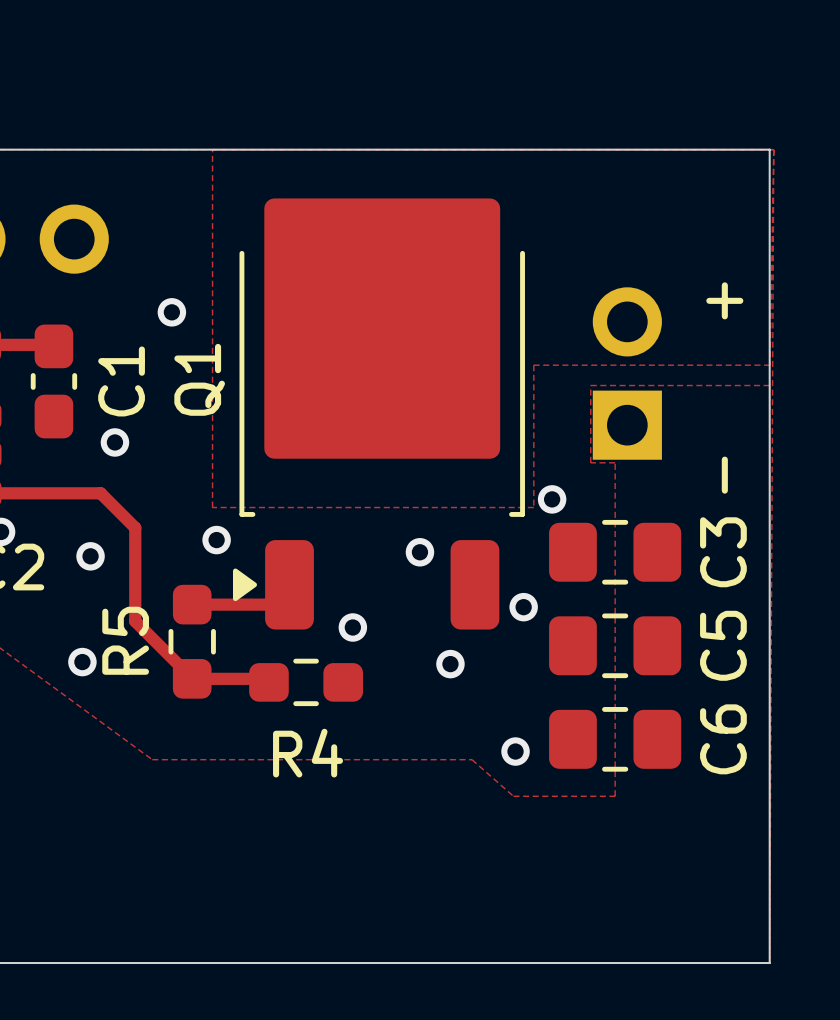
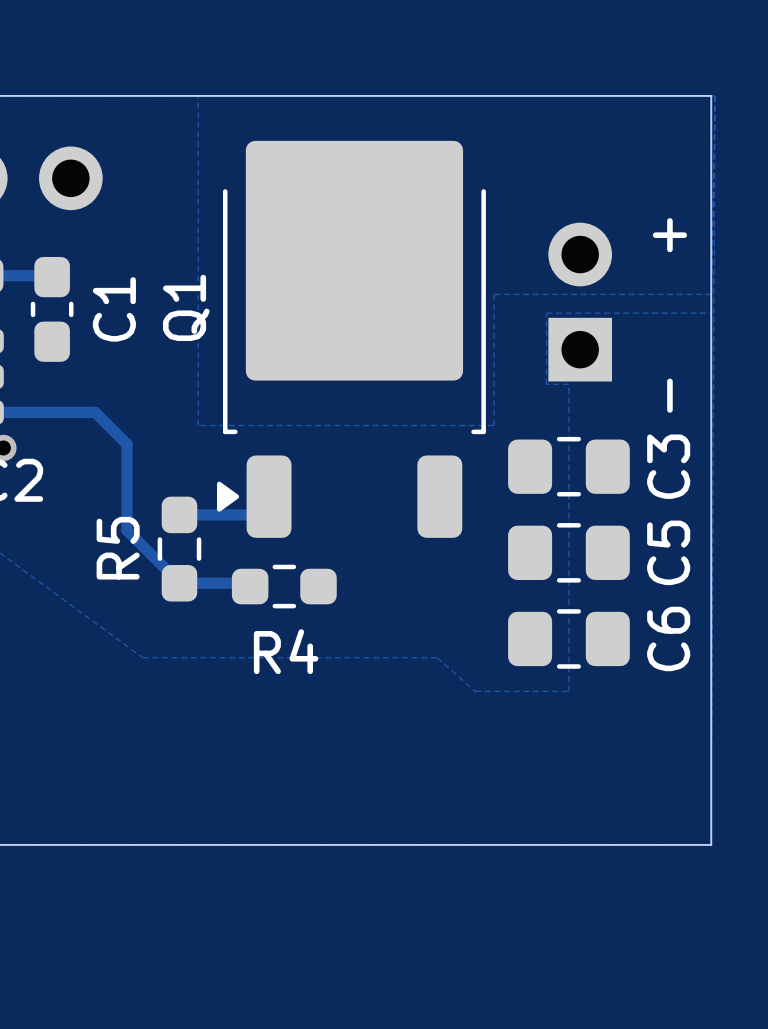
via: (171, 312) -> none
via: (114, 442) -> none
via: (552, 499) -> none
via: (216, 540) -> none
via: (419, 552) -> none
via: (90, 556) -> none
via: (523, 607) -> none
via: (352, 627) -> none
via: (82, 662) -> none
via: (450, 664) -> none
via: (515, 751) -> none

